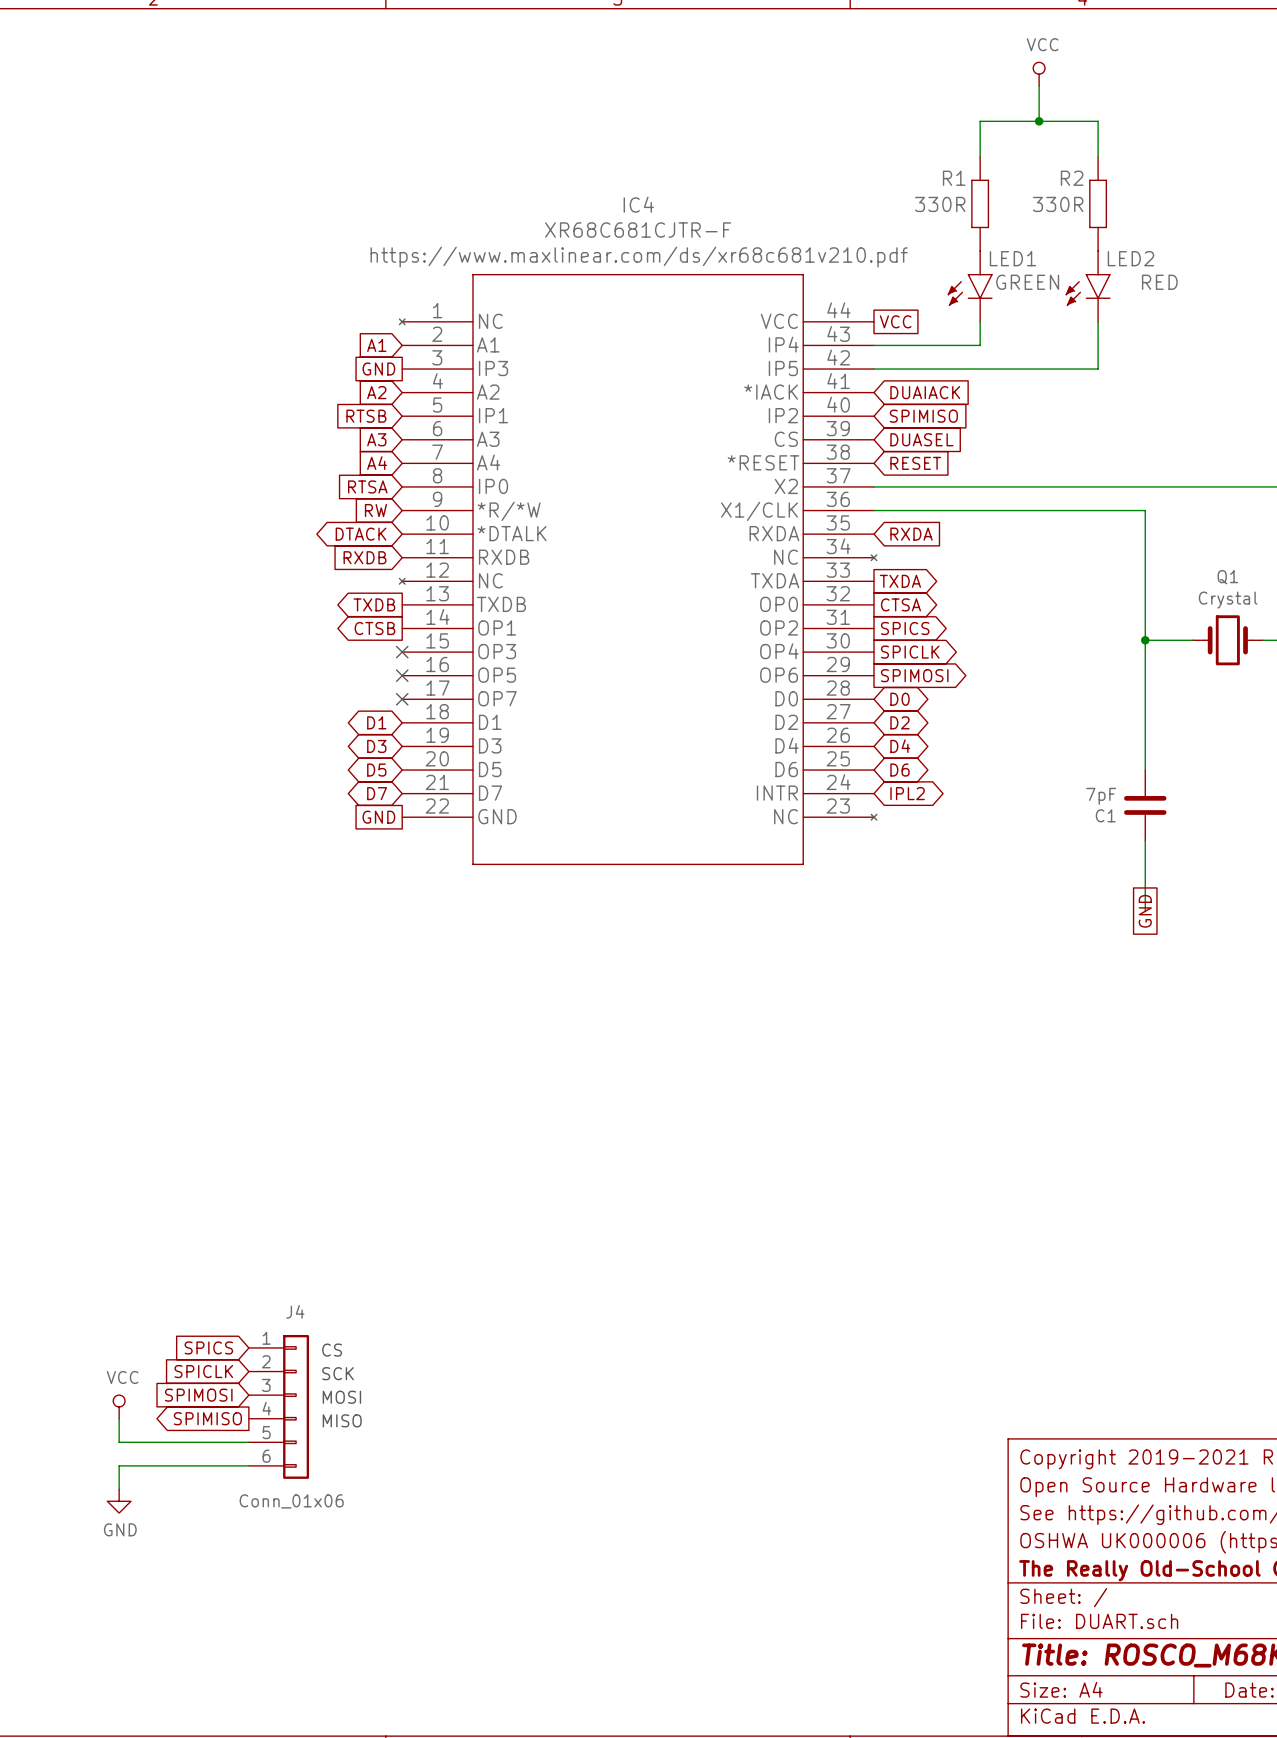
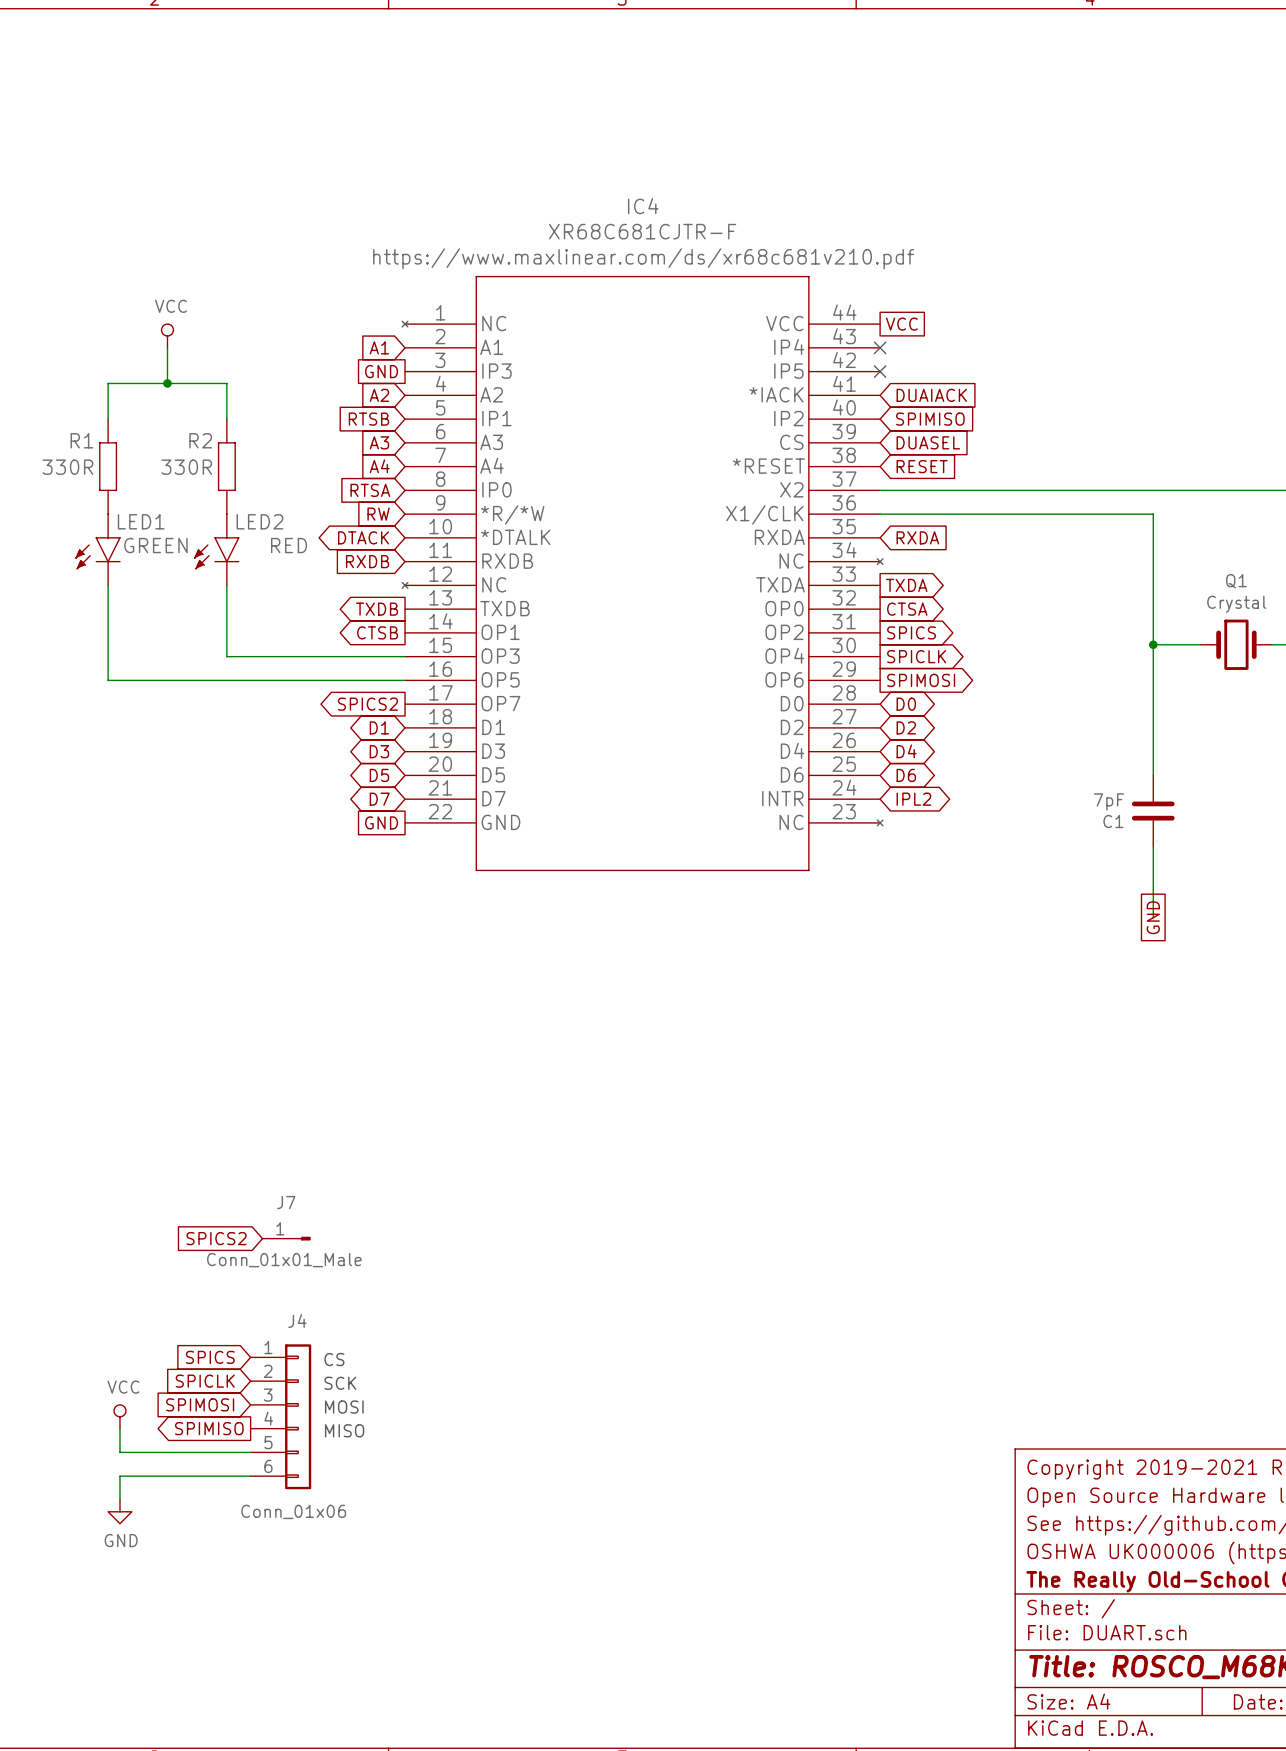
power symbol: VCC (1039, 74) -> none
wire: (1039, 85) (1039, 121) -> none
junction: (1039, 121) -> none
wire: (980, 156) (980, 121) (1098, 121) (1098, 156) -> none
R1 position: (980, 203) -> (108, 466)
R2 position: (1098, 203) -> (226, 466)
LED1 position: (970, 286) -> (98, 549)
LED2 position: (1088, 286) -> (216, 549)
wire: (980, 321) (980, 345) (874, 345) -> none
wire: (1098, 321) (1098, 369) (874, 369) -> none
power symbol: none -> VCC (167, 335)
wire: none -> (167, 347) (167, 383)
no-connect mark: none -> (880, 347)
no-connect mark: none -> (880, 371)
junction: none -> (167, 383)
wire: none -> (108, 419) (108, 383) (226, 383) (226, 419)
wire: none -> (108, 585) (108, 680) (405, 680)
wire: none -> (226, 585) (226, 656) (405, 656)
no-connect mark: (402, 652) -> none
no-connect mark: (402, 675) -> none
global label: none -> SPICS2 (367, 704)
no-connect mark: (402, 699) -> none
global label: none -> SPICS2 (216, 1238)
J7: none -> Conn_01x01_Male (286, 1238)

